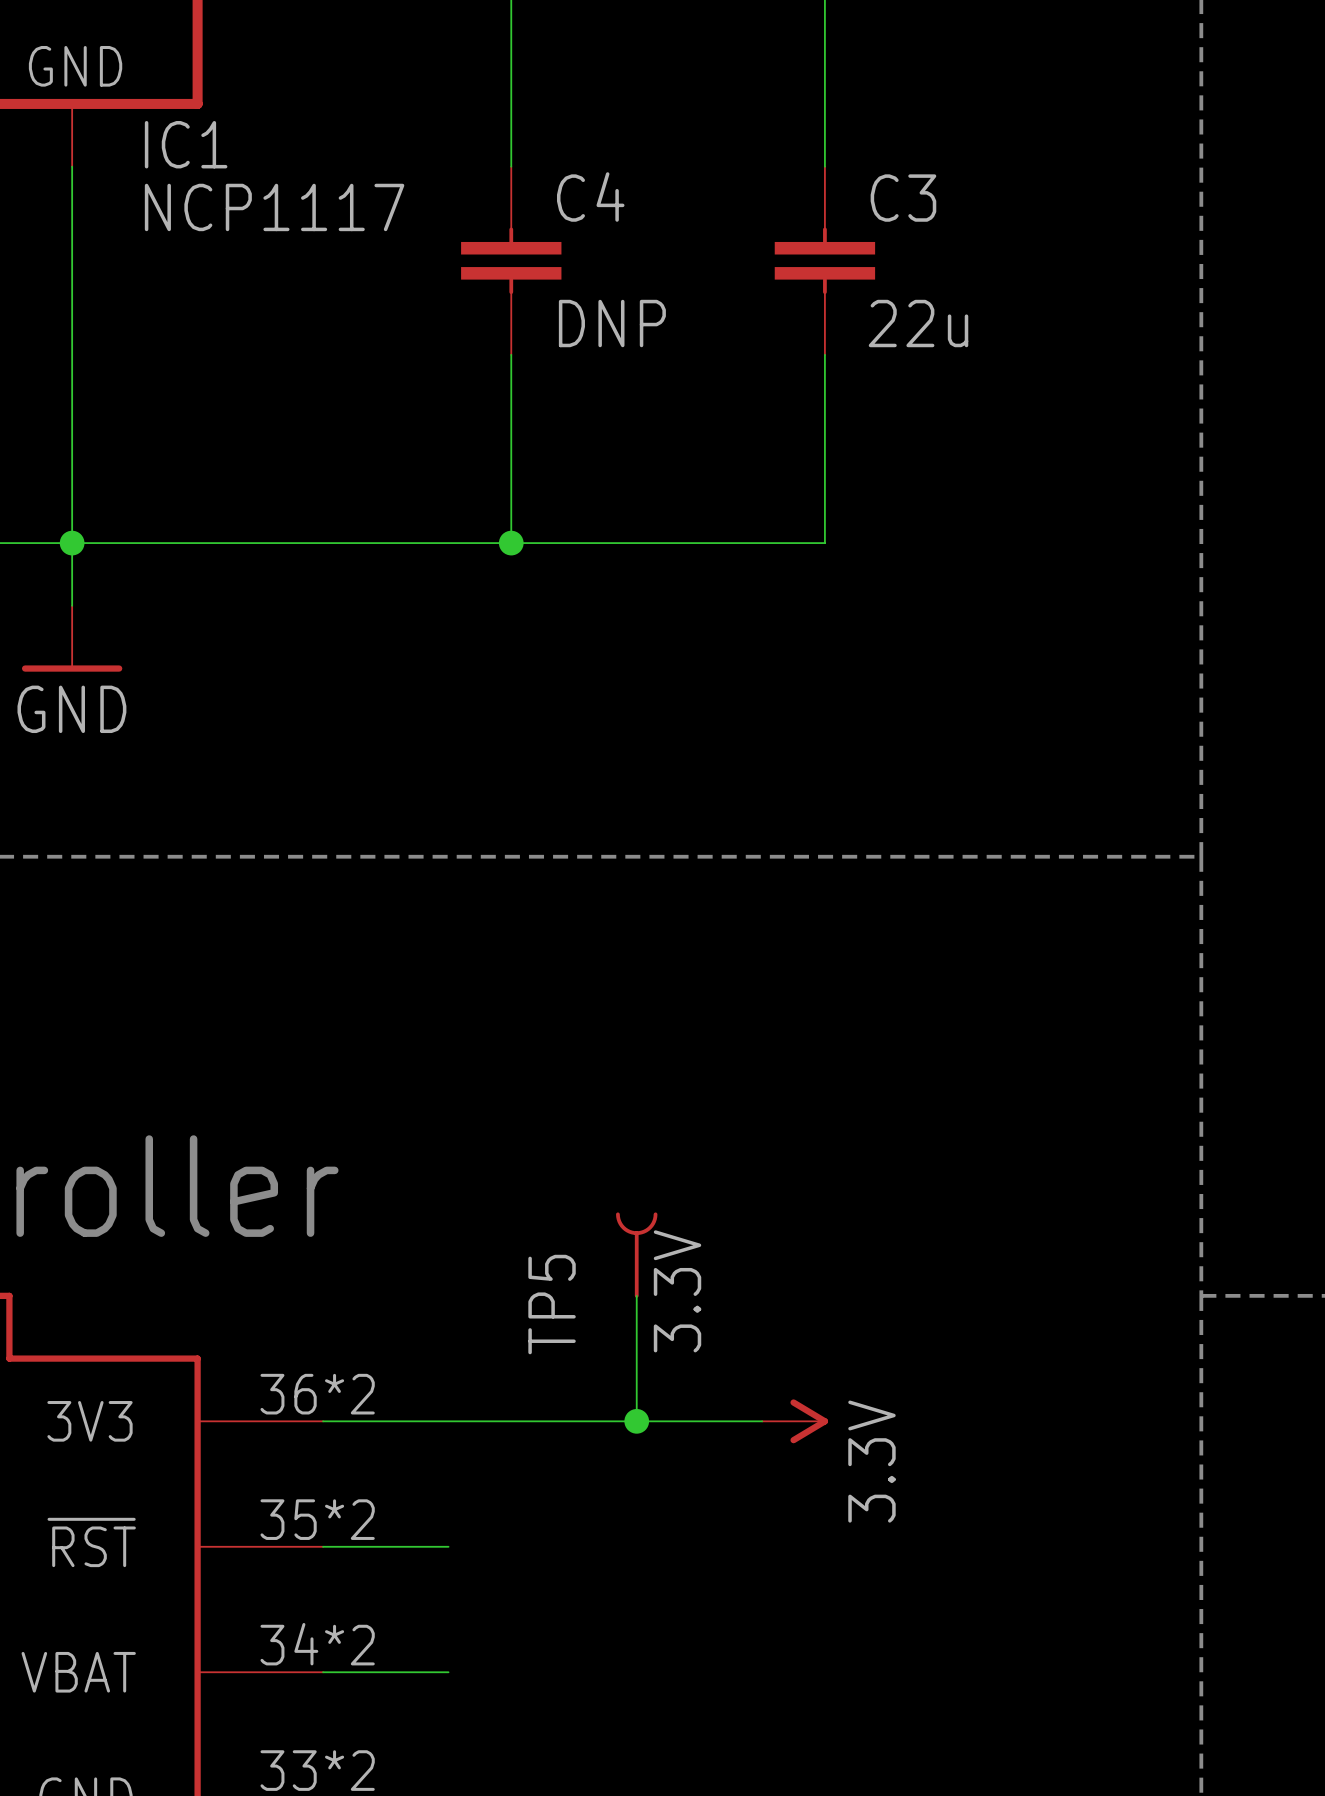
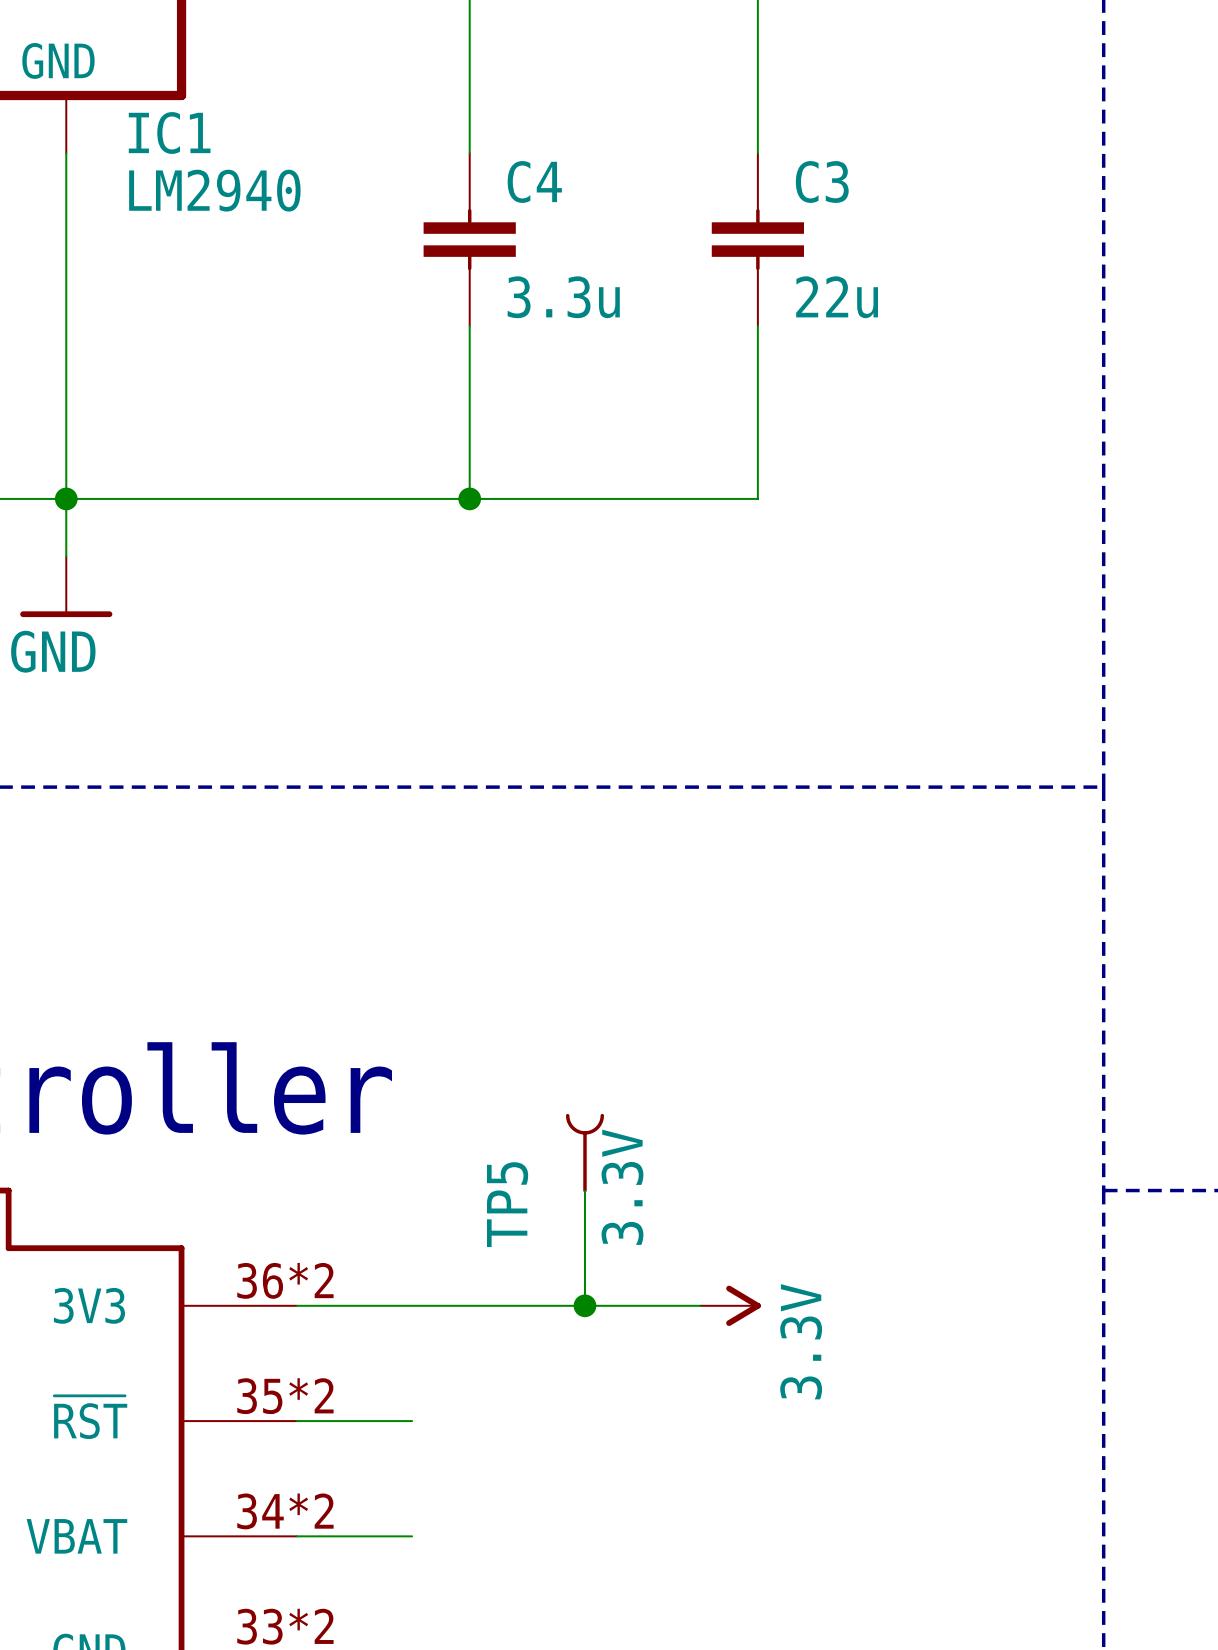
IC1 value: NCP1117 (274, 207) -> LM2940 (214, 190)
C4 value: DNP (612, 323) -> 3.3u (563, 297)

